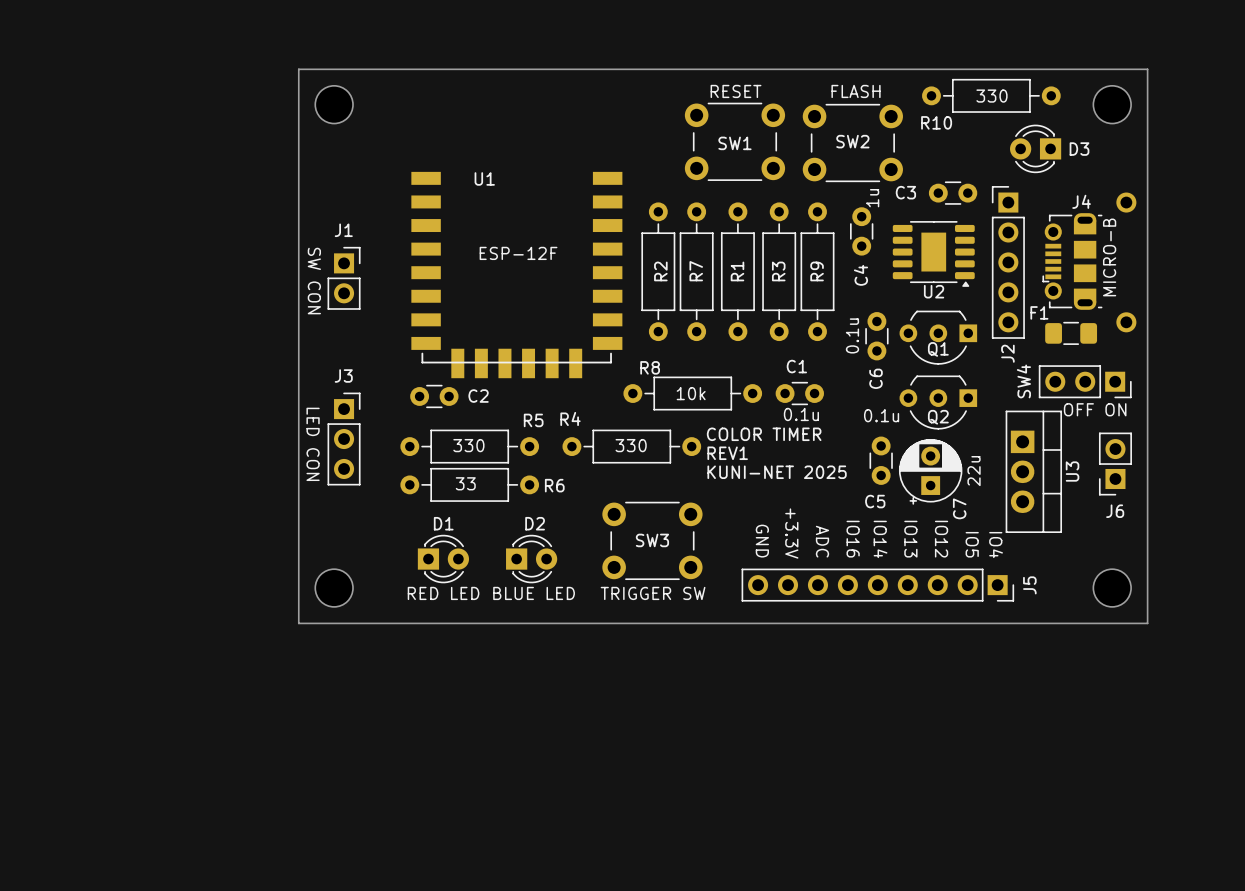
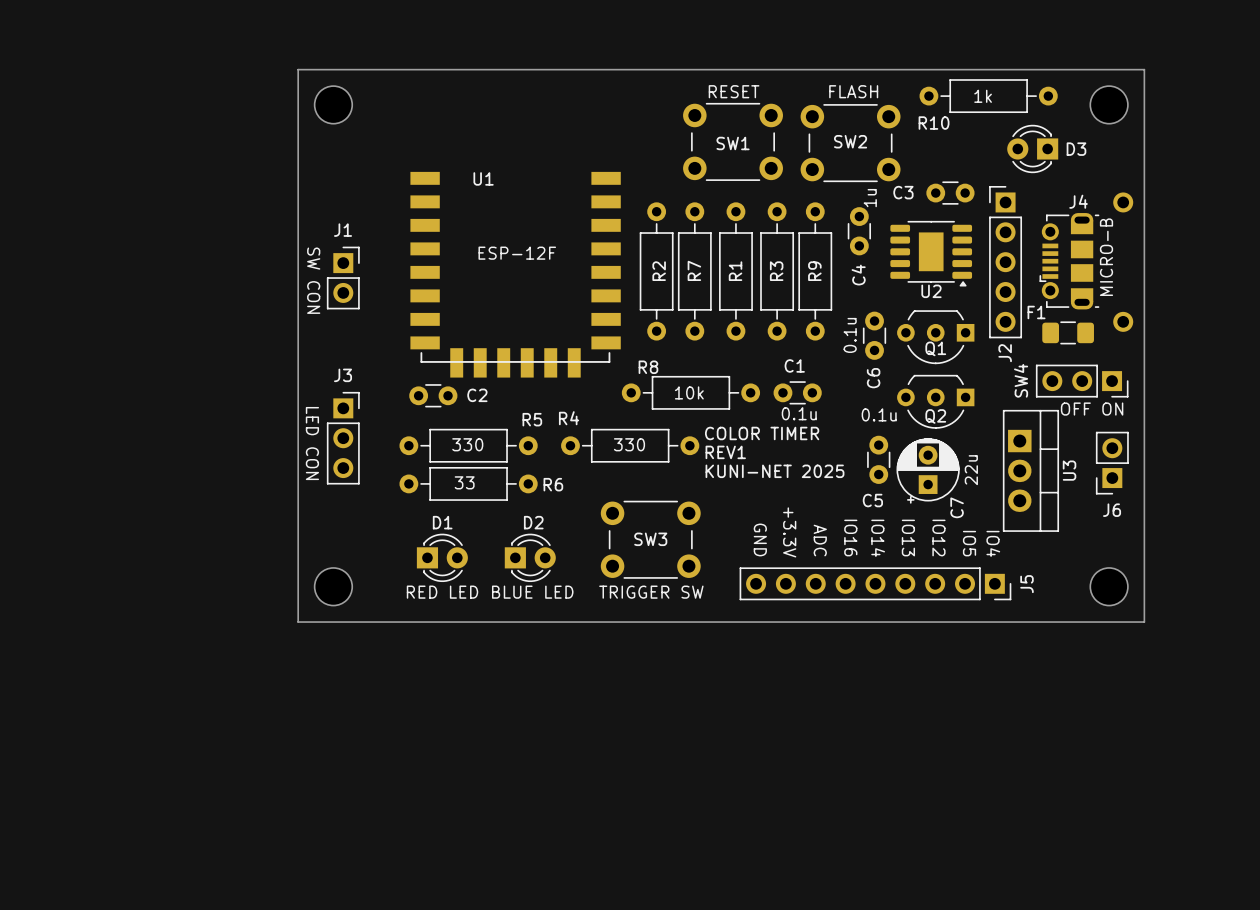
text: 330 (991, 96) -> 1k (983, 96)

